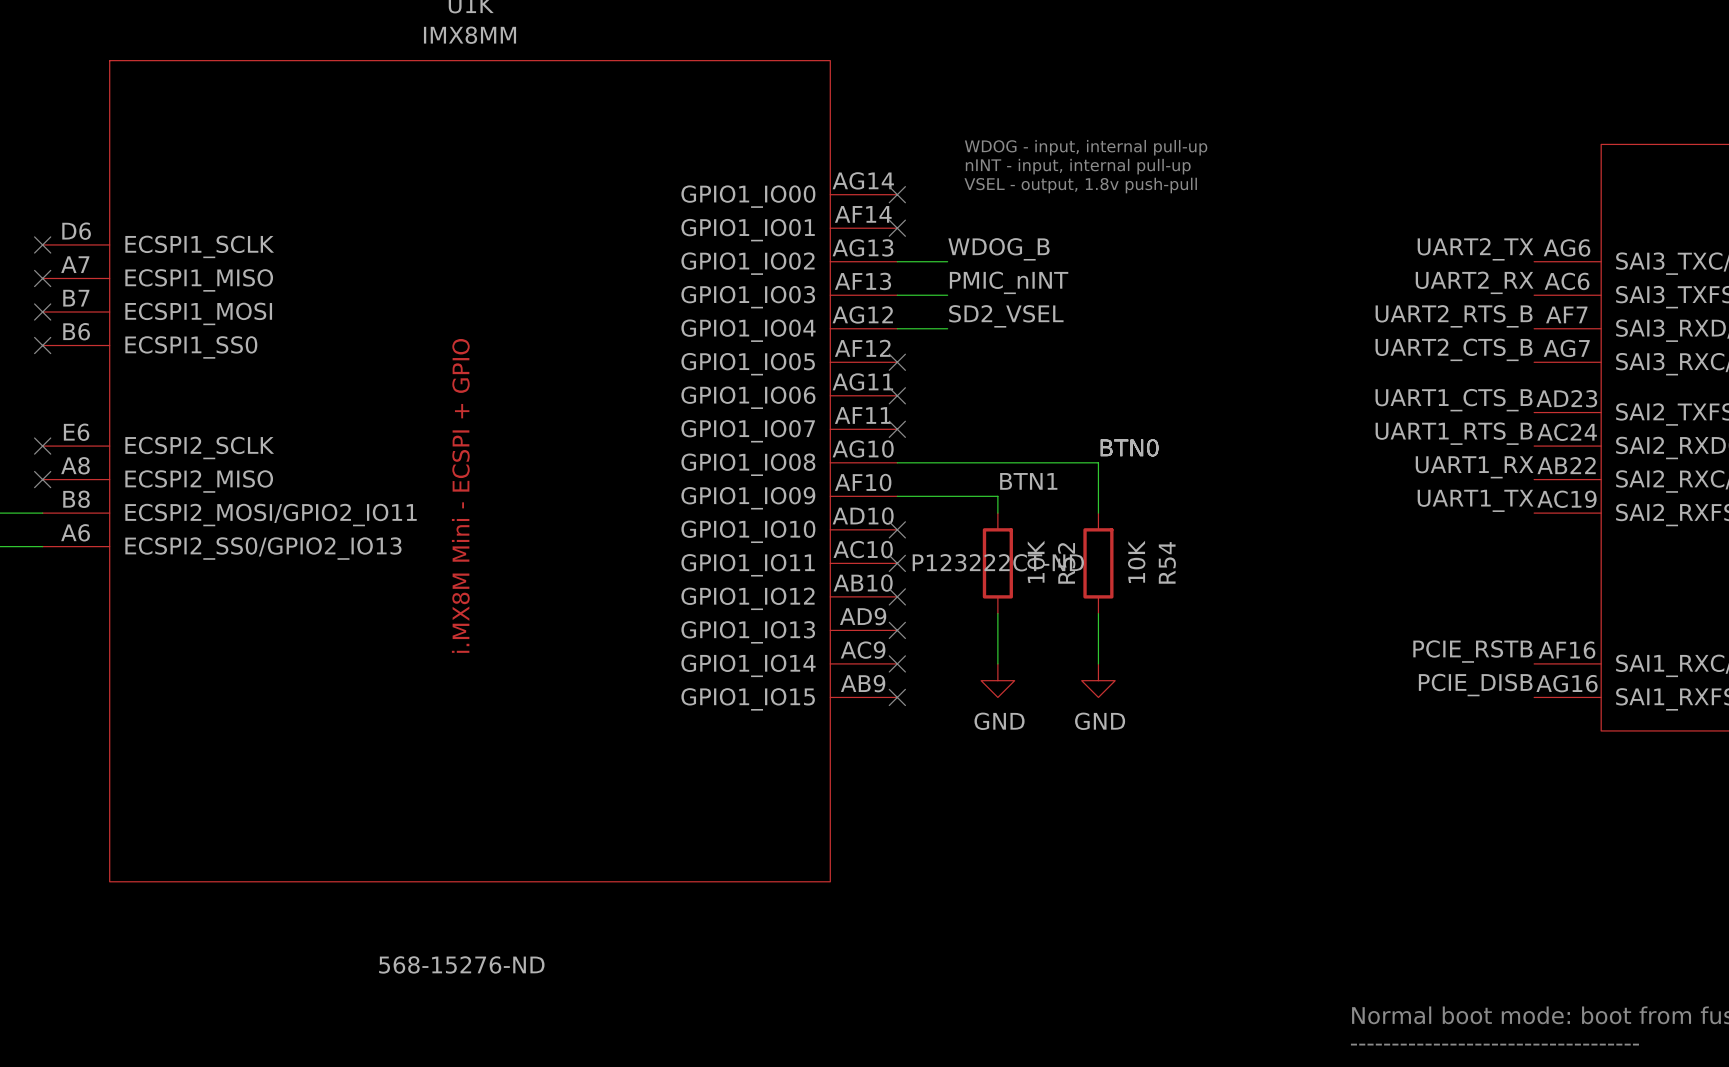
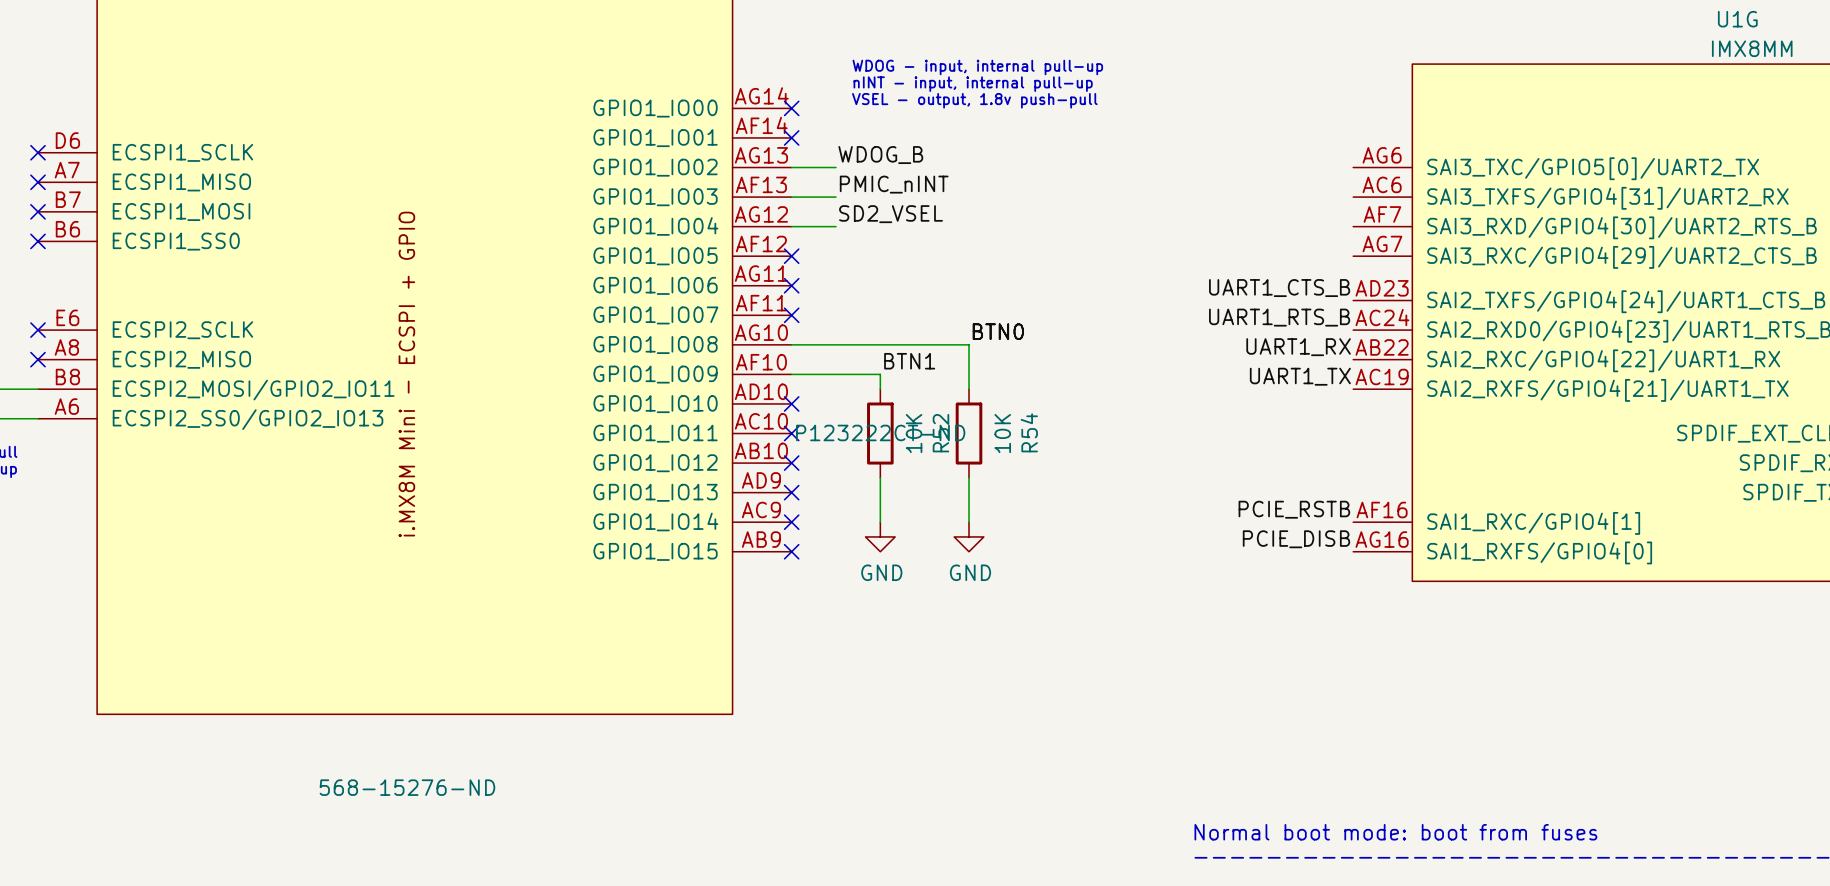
label: UART2_TX (1475, 249) -> none
label: UART2_RX (1474, 282) -> none
label: UART2_RTS_B (1454, 316) -> none
label: UART2_CTS_B (1454, 349) -> none

